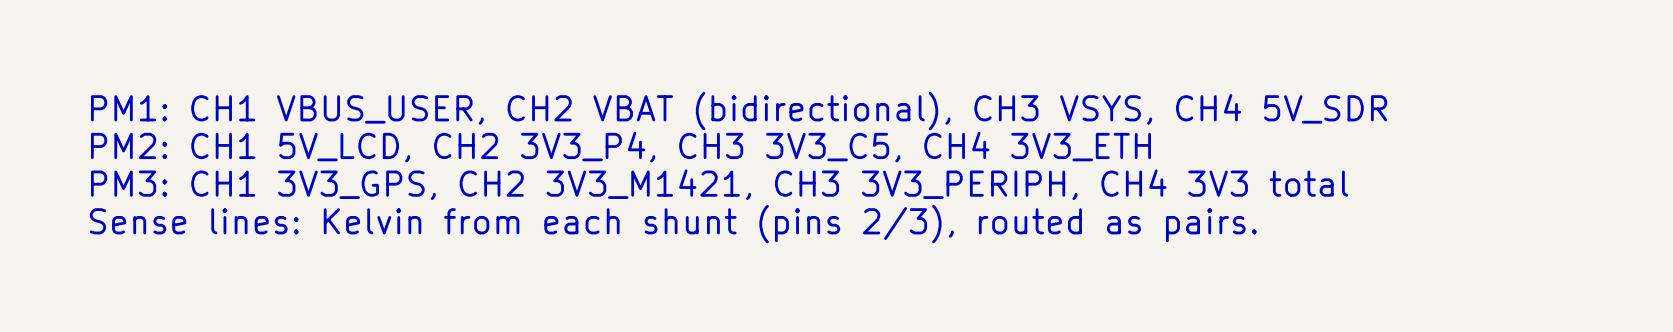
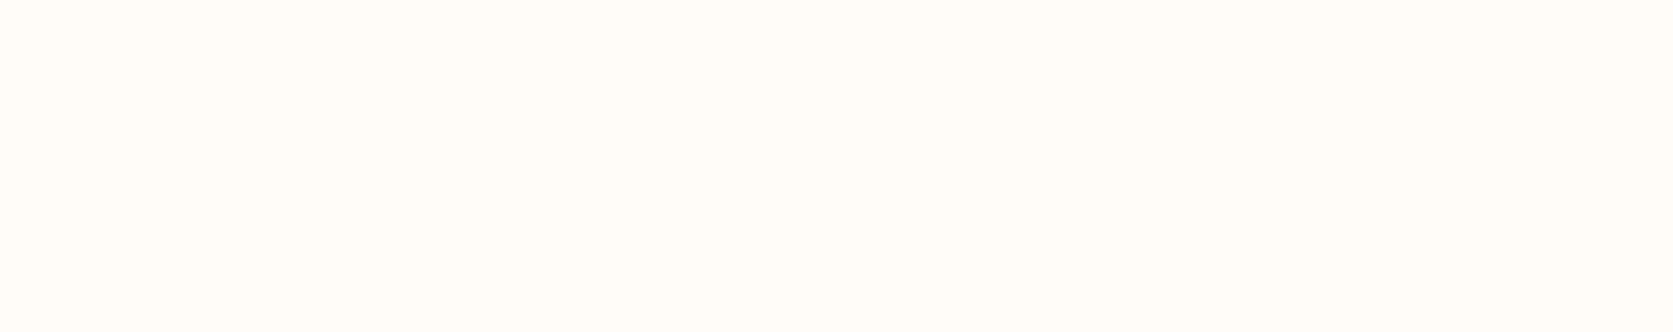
text: PM1: CH1 VBUS_USER, CH2 VBAT (bidirectional), CH3 VSYS, CH4 5V_SDR (739, 111) -> none
text: PM2: CH1 5V_LCD, CH2 3V3_P4, CH3 3V3_C5, CH4 3V3_ETH (620, 147) -> none
text: PM3: CH1 3V3_GPS, CH2 3V3_M1421, CH3 3V3_PERIPH, CH4 3V3 total (719, 184) -> none
text: Sense lines: Kelvin from each shunt (pins 2/3), routed as pairs. (673, 224) -> none

